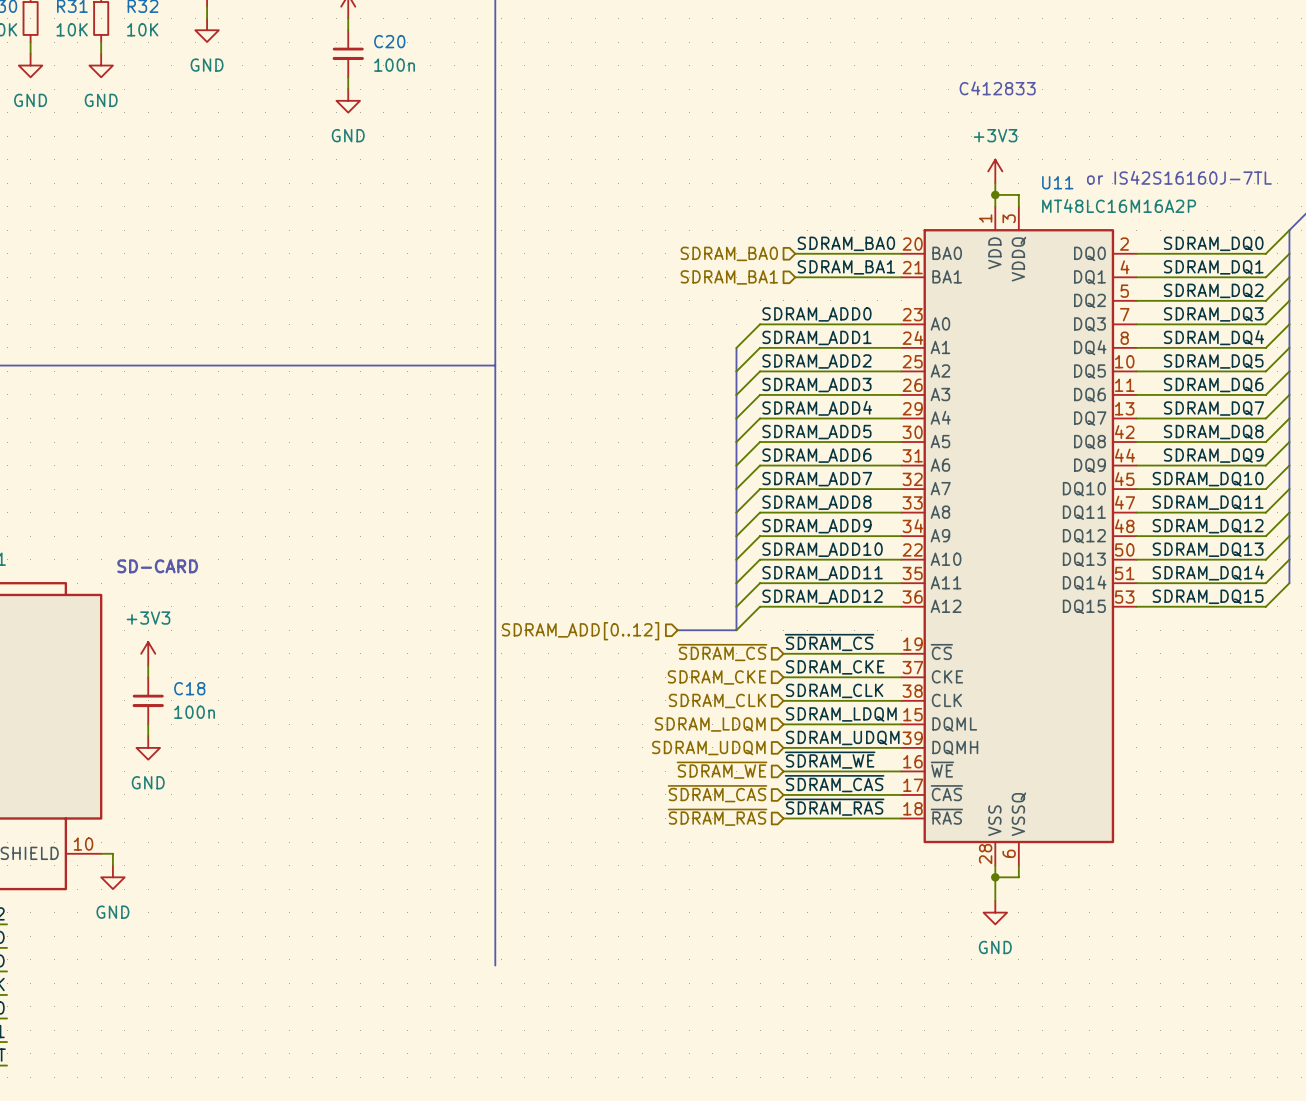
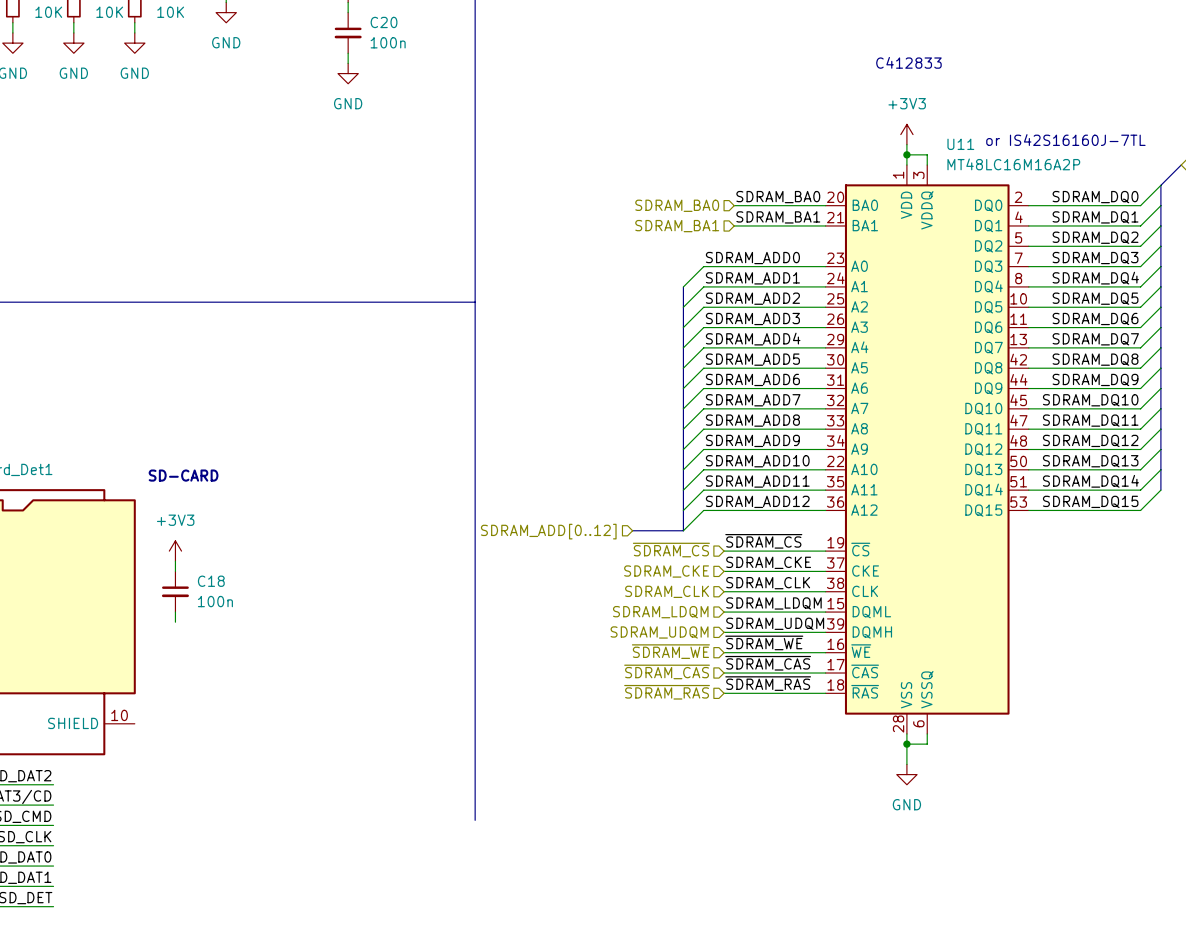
power symbol: GND (148, 747) -> none
wire: (101, 853) (112, 853) (112, 865) -> none
power symbol: GND (112, 877) -> none

